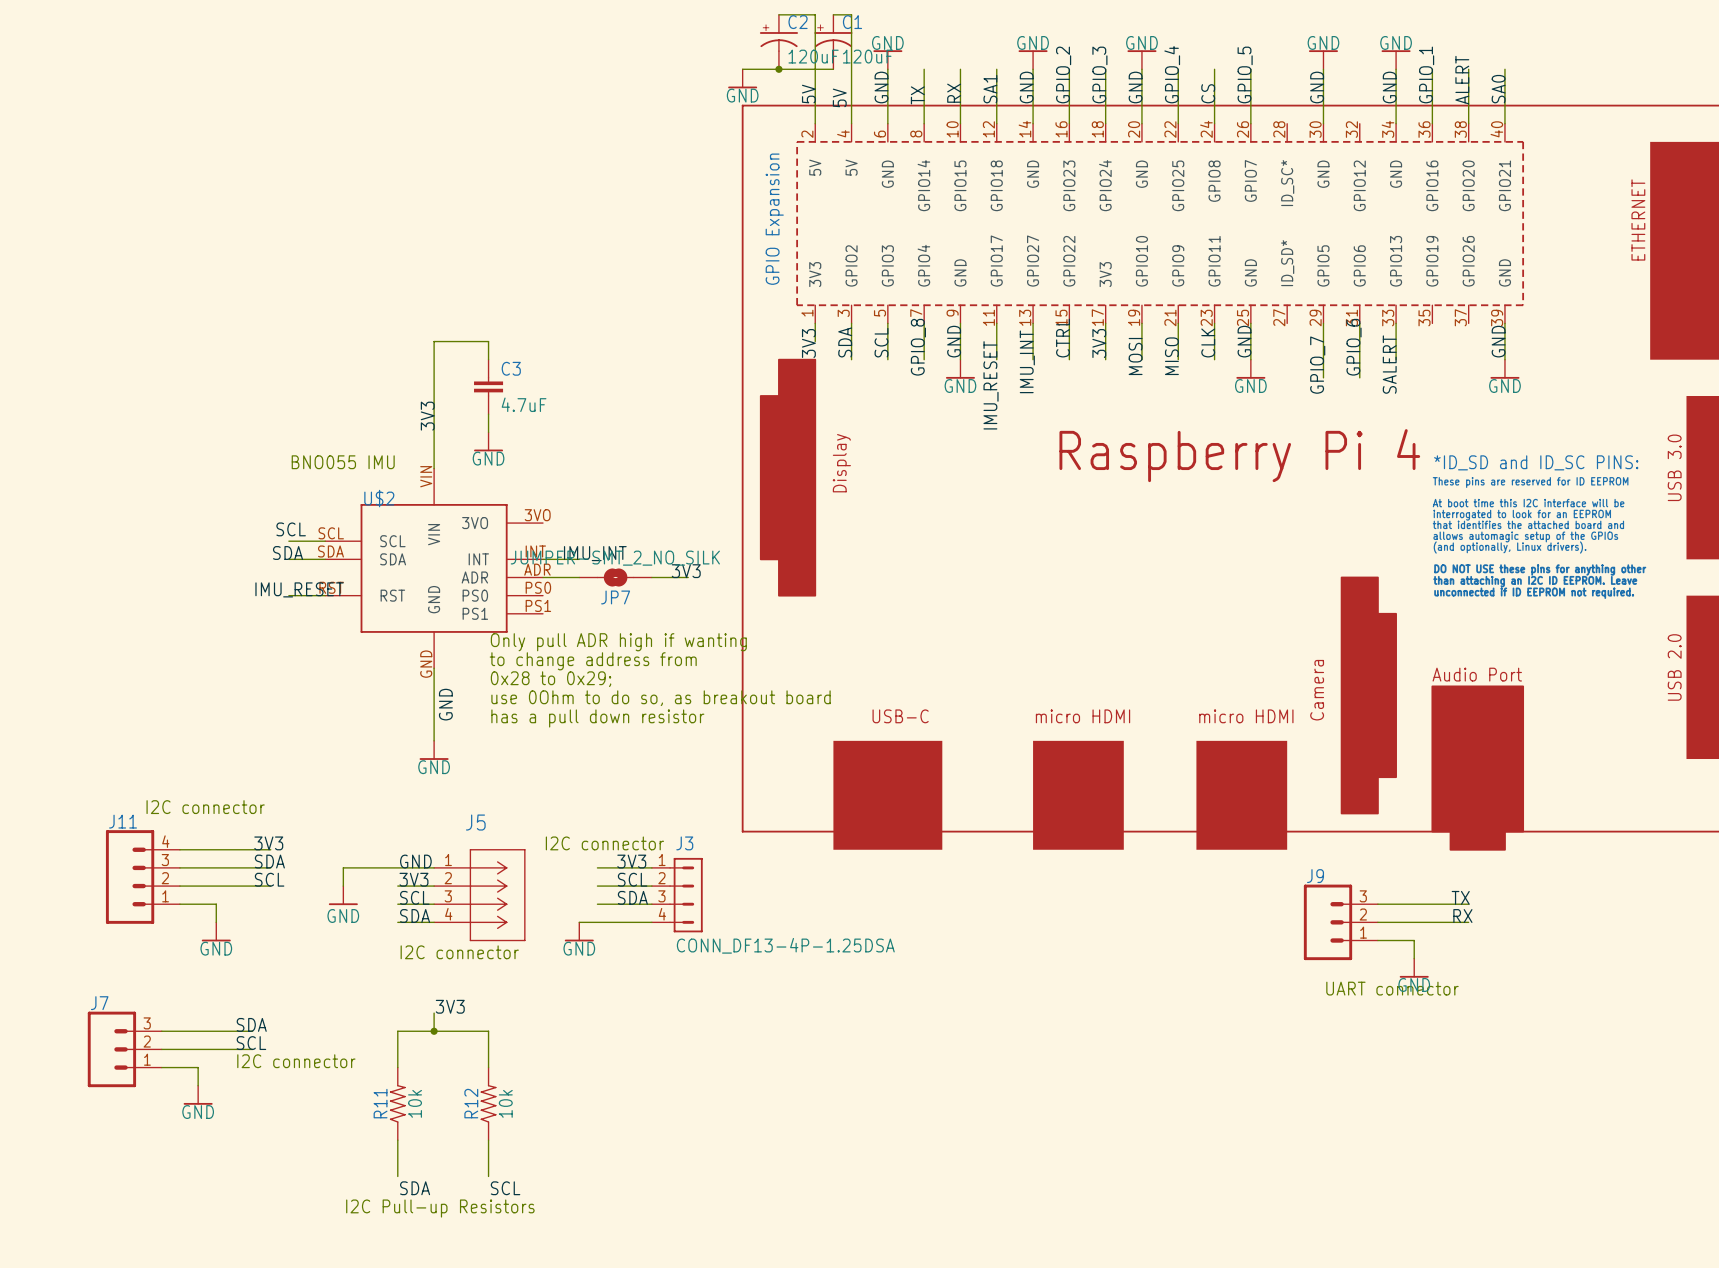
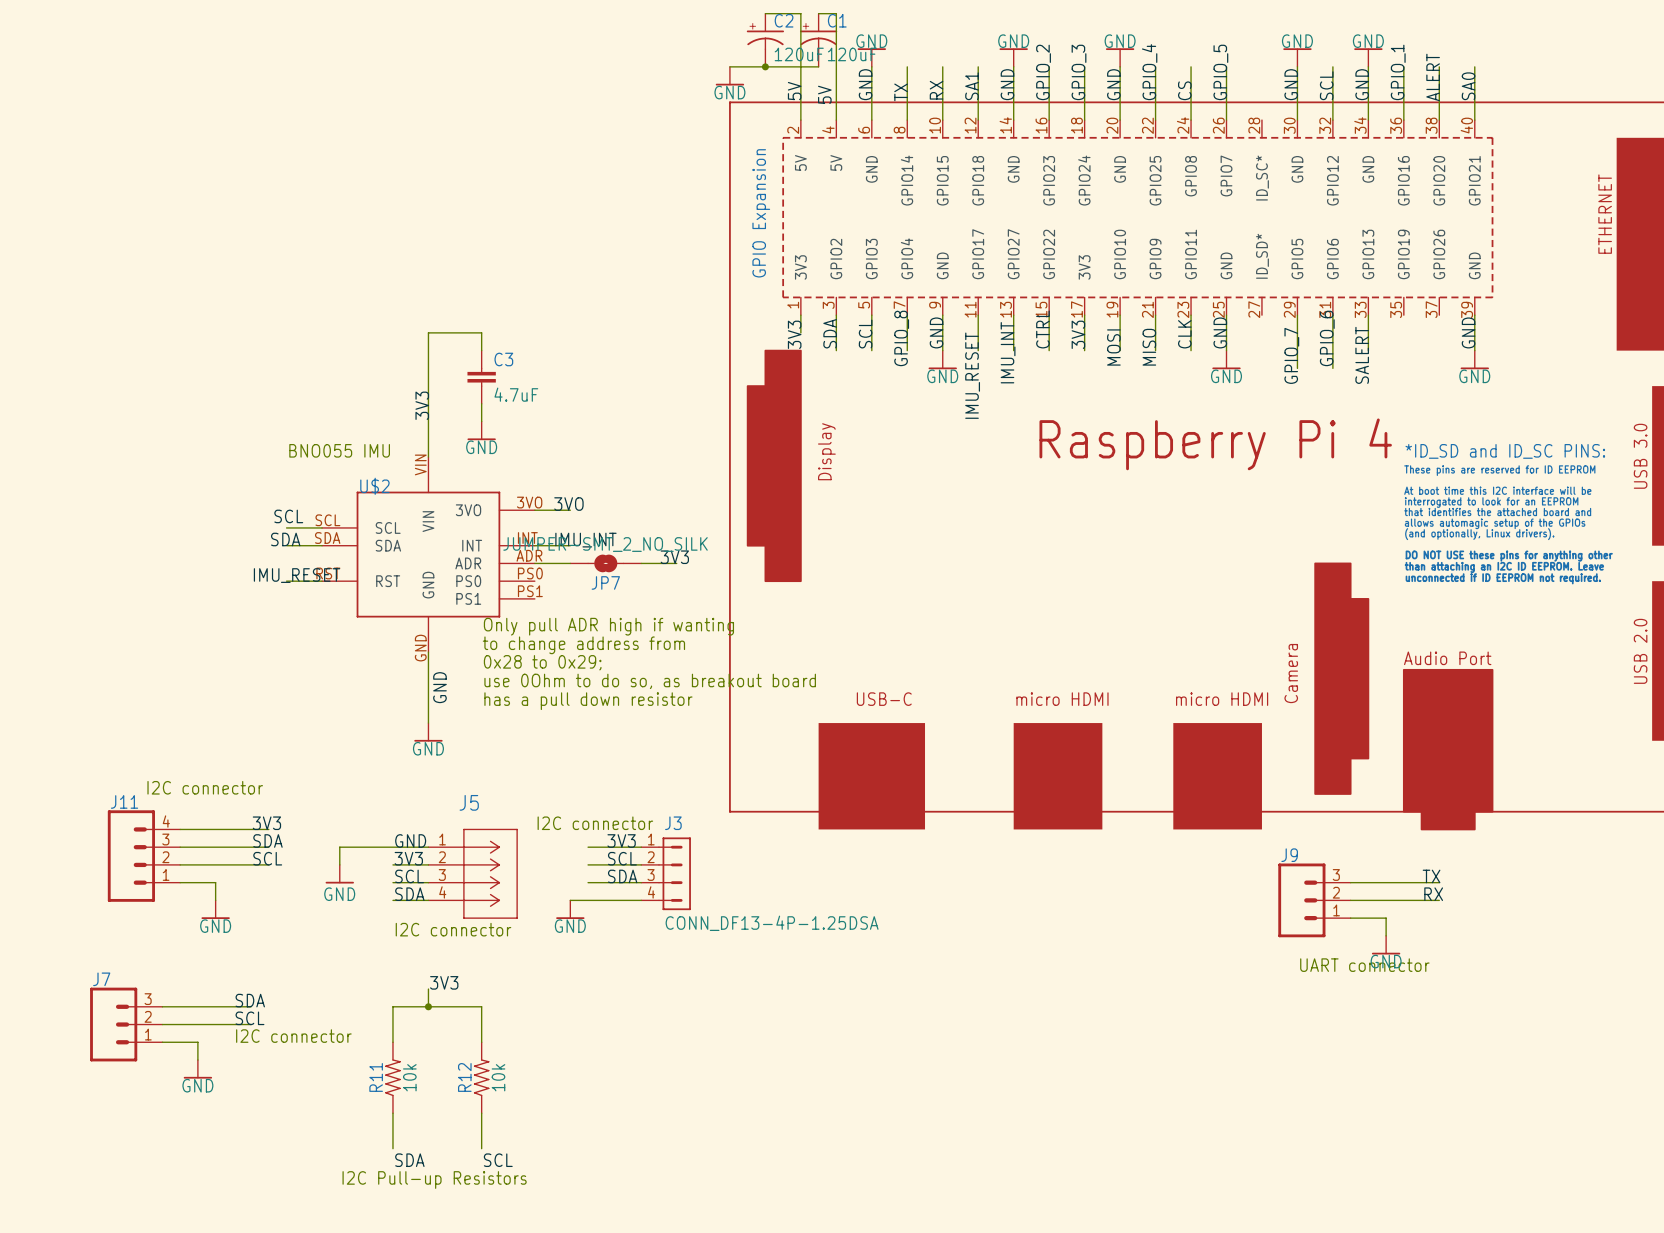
wire: none -> (1332, 66) (1332, 120)
label: none -> SCL (1326, 85)
label: none -> 3VO (568, 504)
wire: none -> (534, 510) (570, 510)

